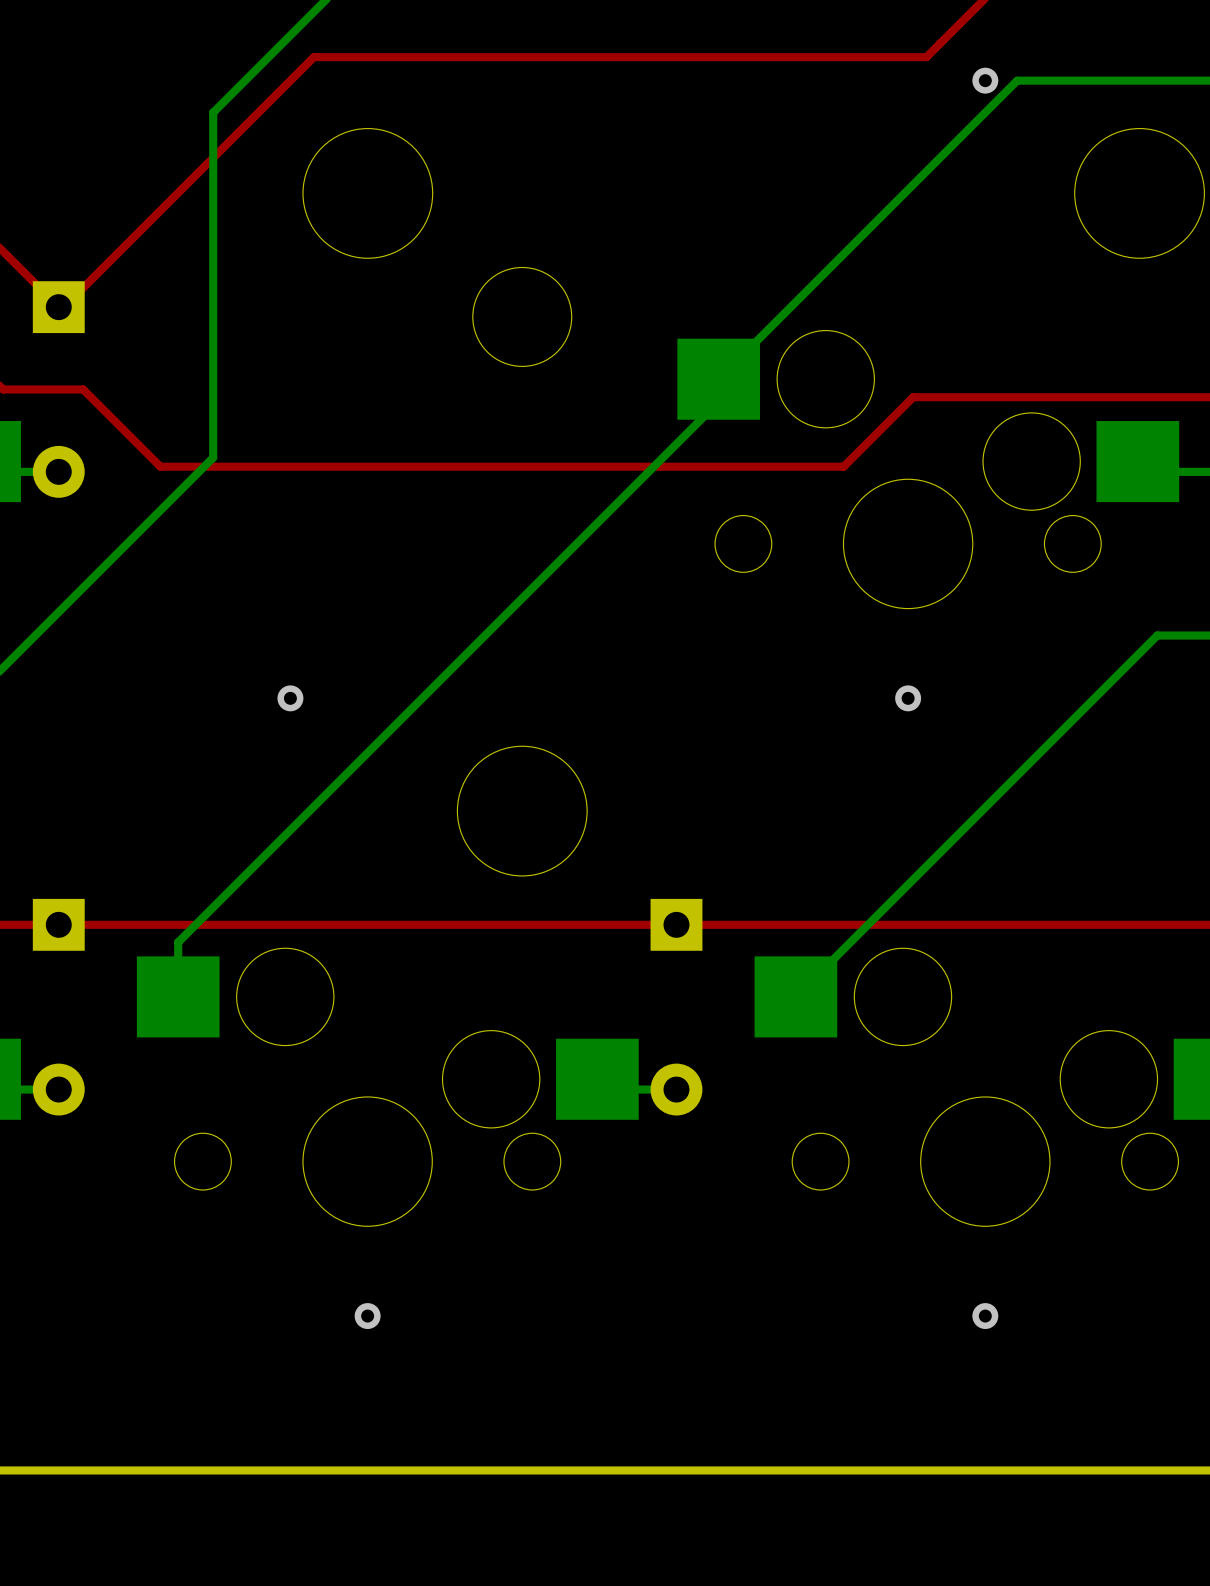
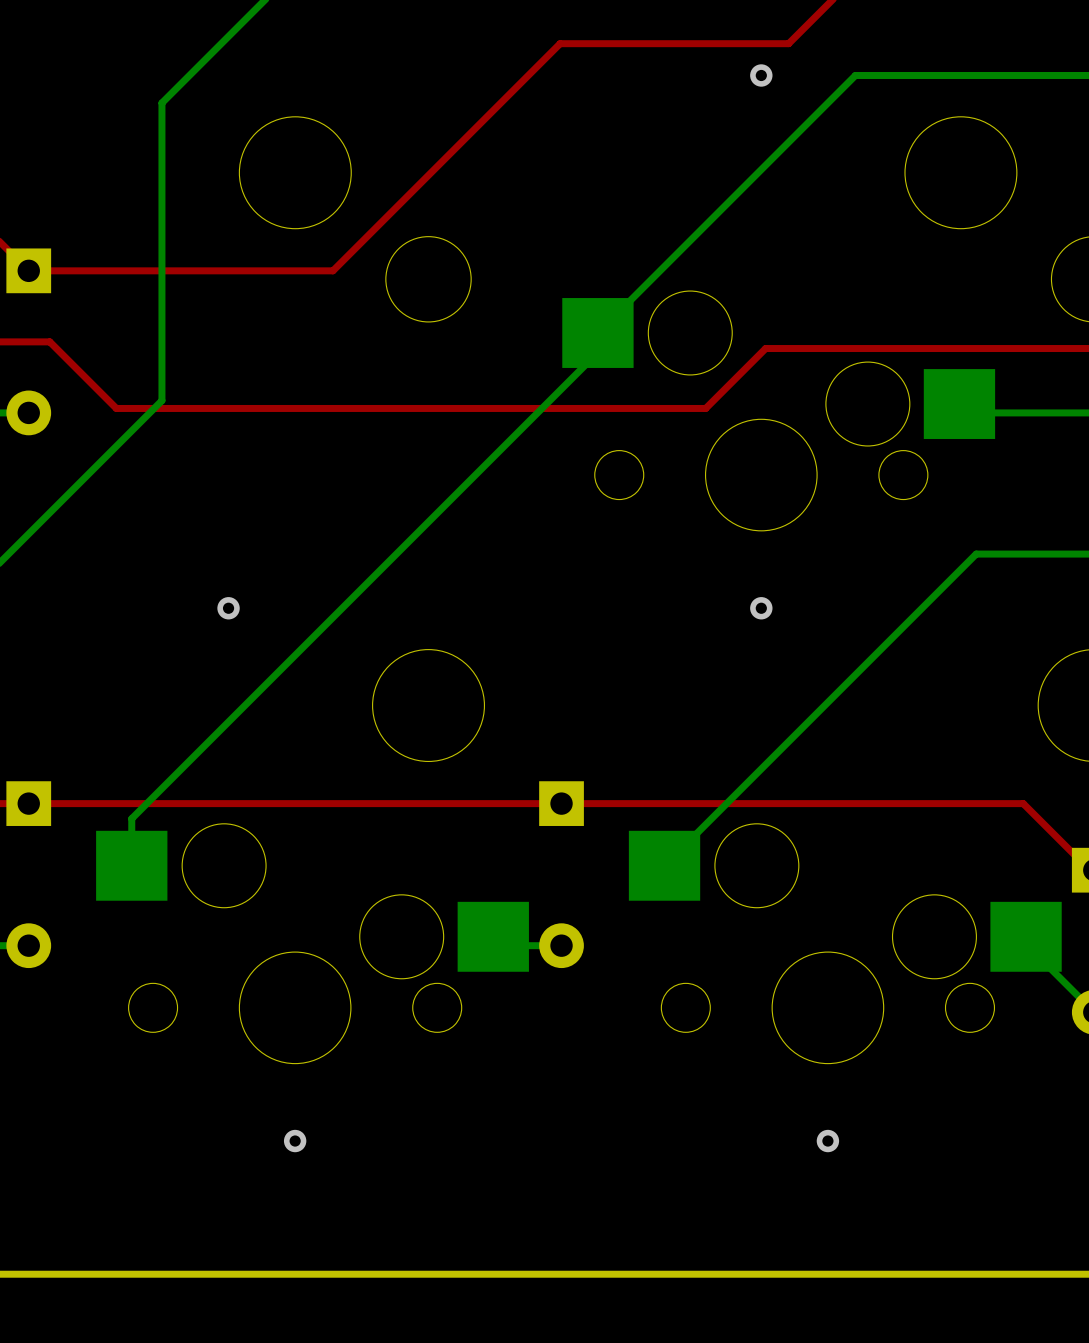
top track: (939, 43) (926, 57) (313, 57) (63, 307) -> (788, 43) (560, 43) (332, 270) (33, 270)
via position: (985, 80) -> (761, 75)

